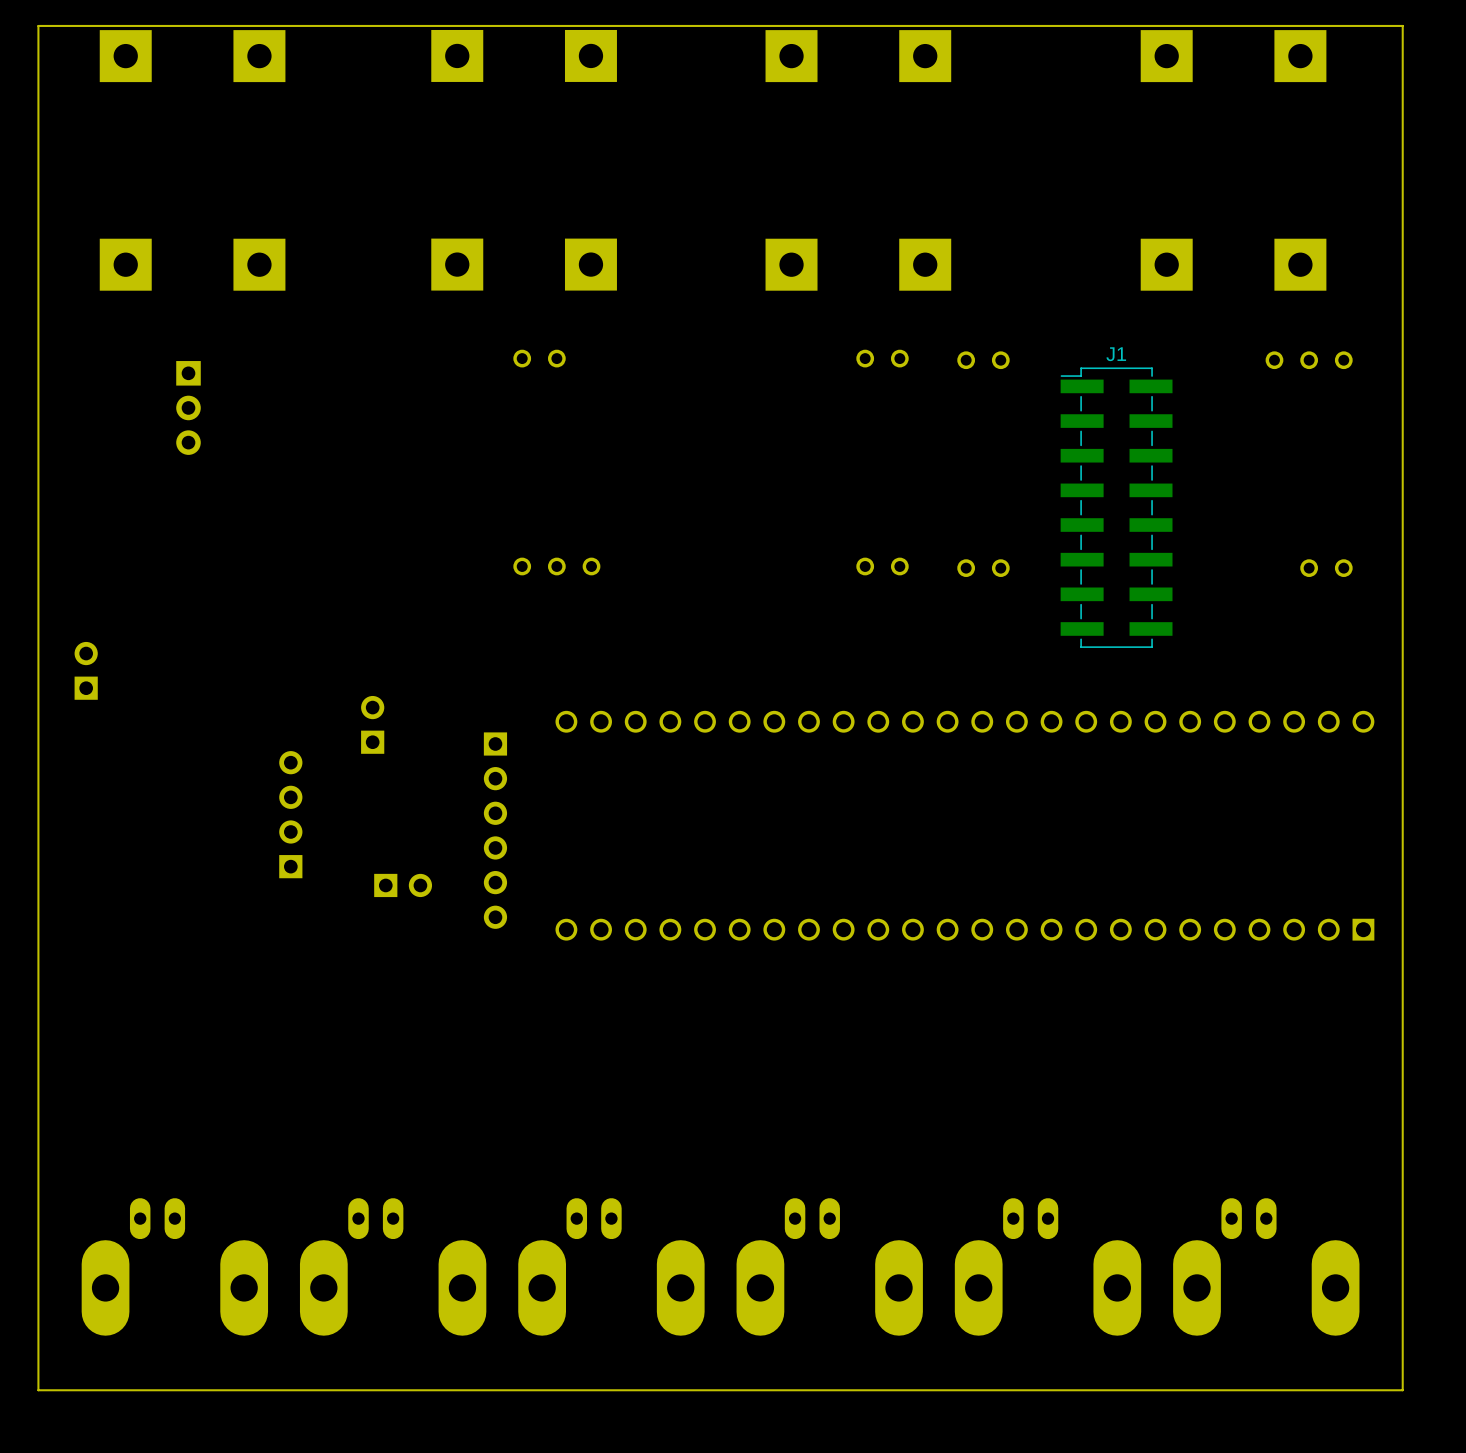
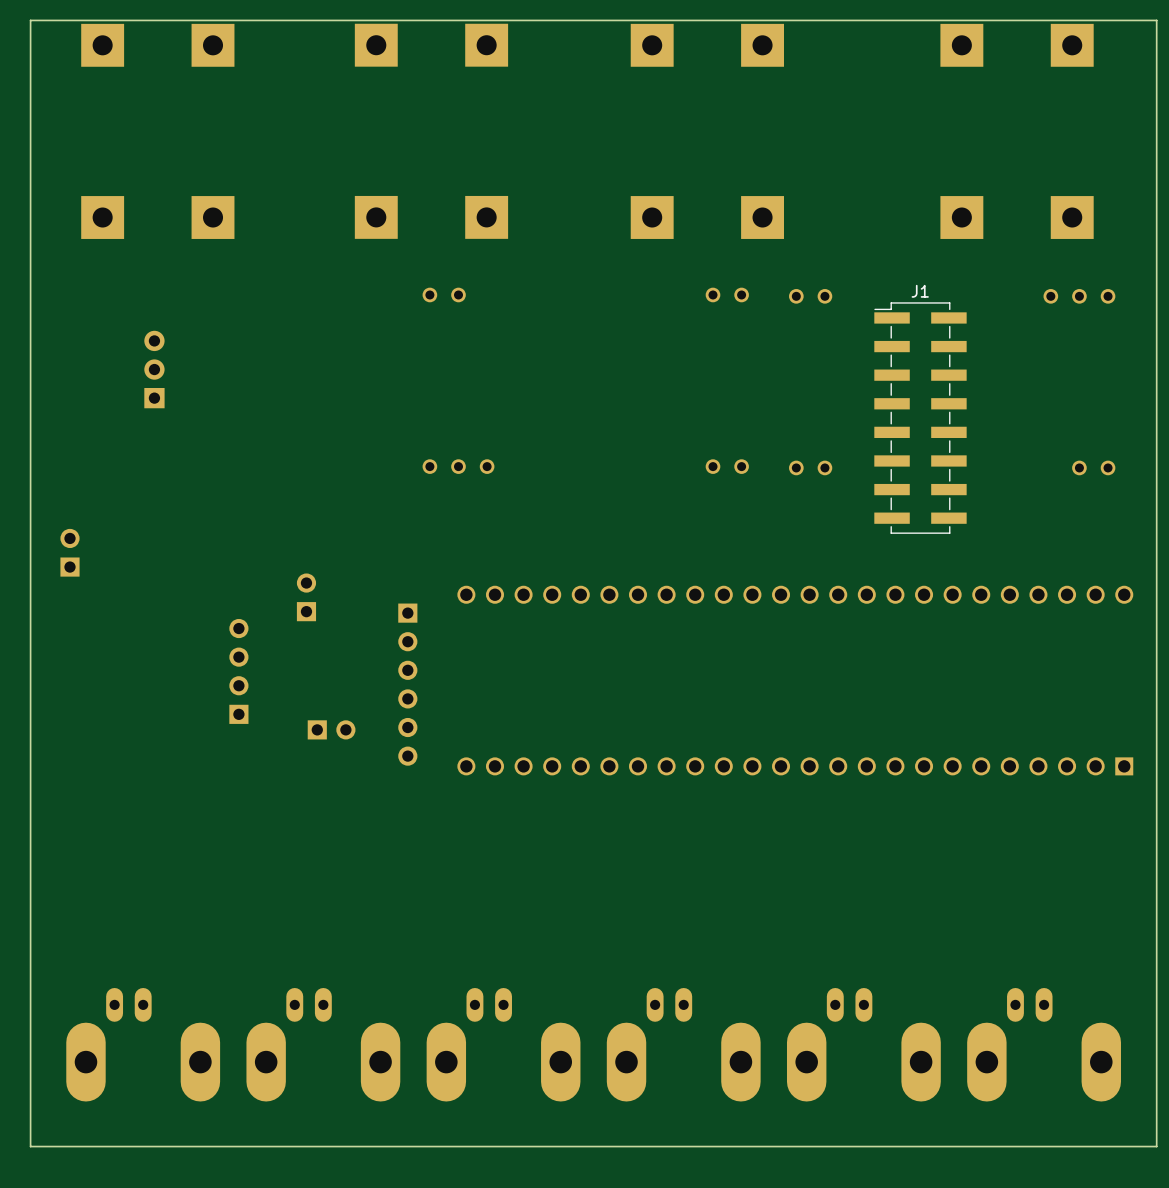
part rotation: 0° (188, 407) -> 180° (154, 369)

